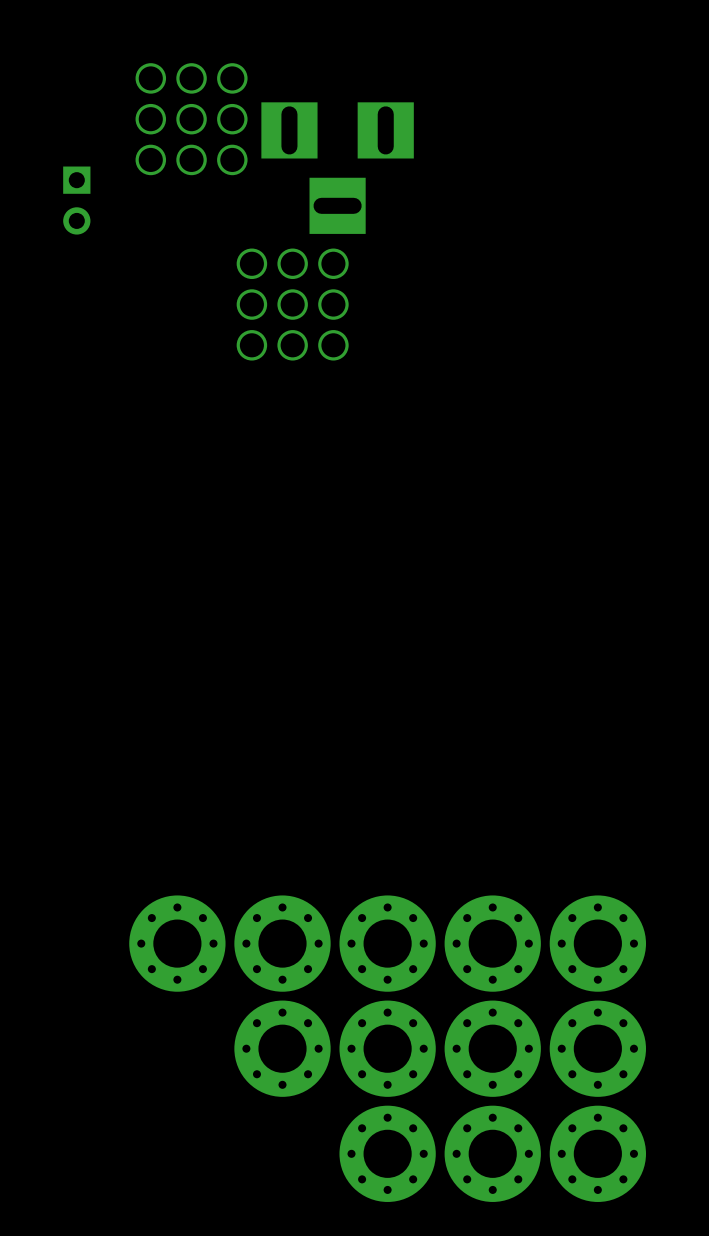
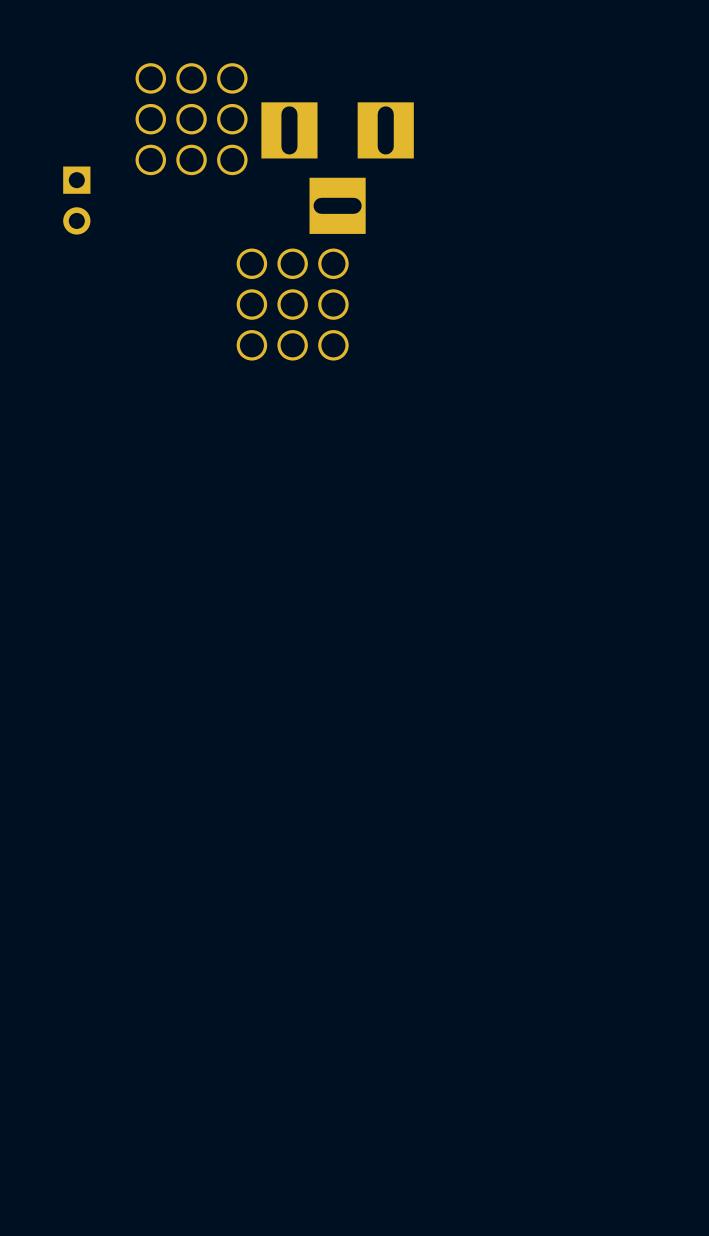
part: (177, 943) -> none
part: (282, 943) -> none
part: (387, 943) -> none
part: (492, 943) -> none
part: (597, 943) -> none
part: (282, 1048) -> none
part: (387, 1048) -> none
part: (492, 1048) -> none
part: (597, 1048) -> none
part: (387, 1153) -> none
part: (492, 1153) -> none
part: (597, 1153) -> none

